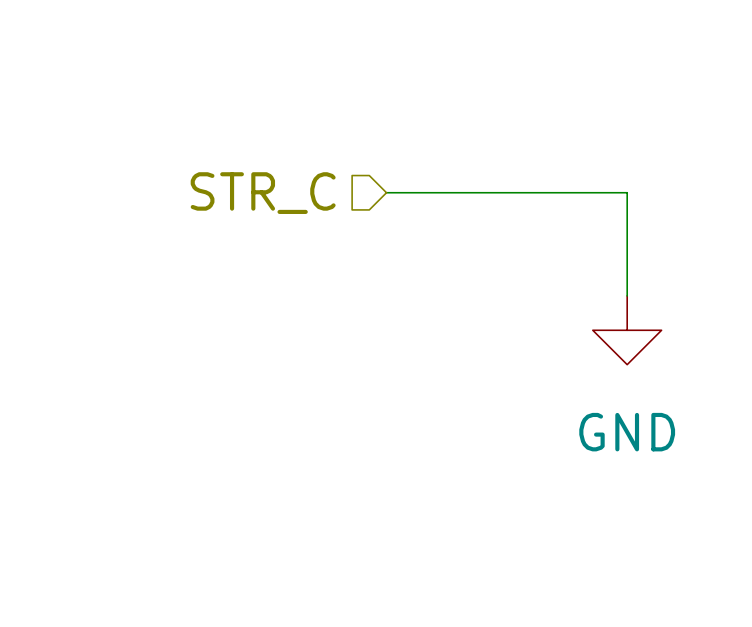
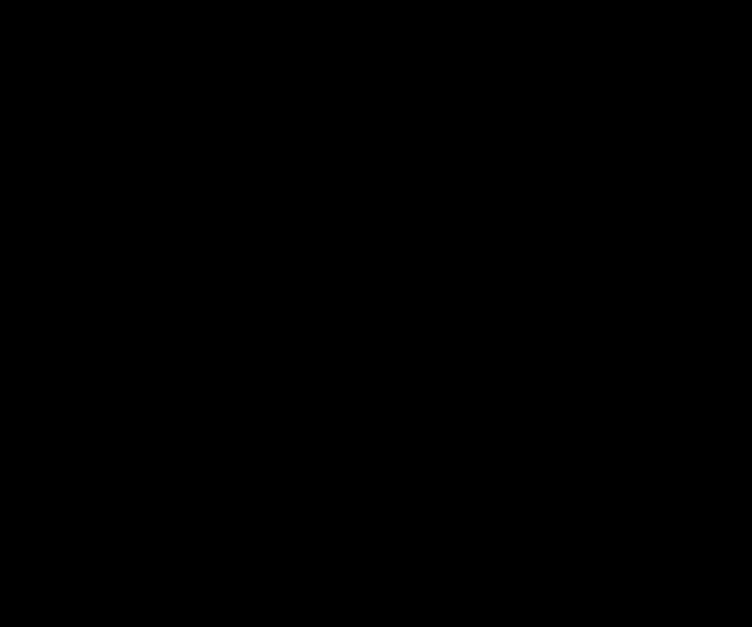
wire: (386, 192) (627, 192) (627, 295) -> none
hierarchical label: STR_C (263, 193) -> none
power symbol: GND (627, 330) -> none

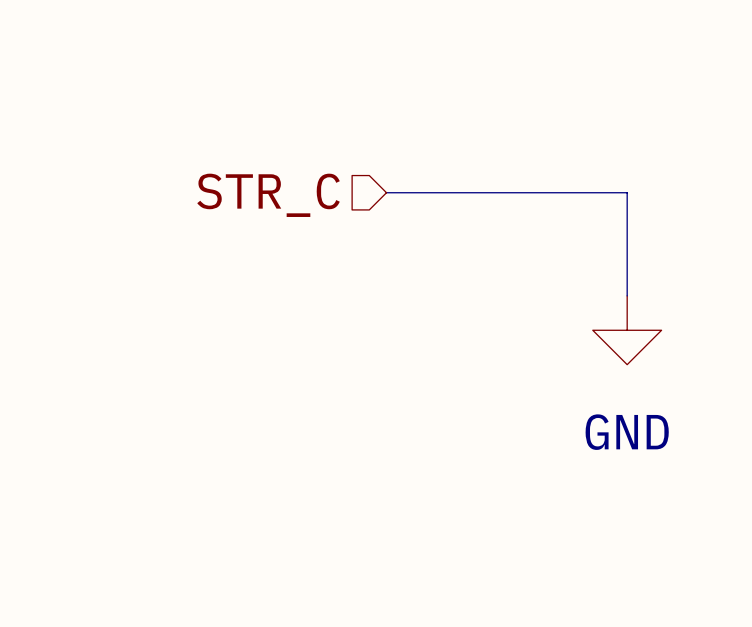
wire: none -> (386, 192) (627, 192) (627, 295)
hierarchical label: none -> STR_C (268, 195)
power symbol: none -> GND (627, 330)

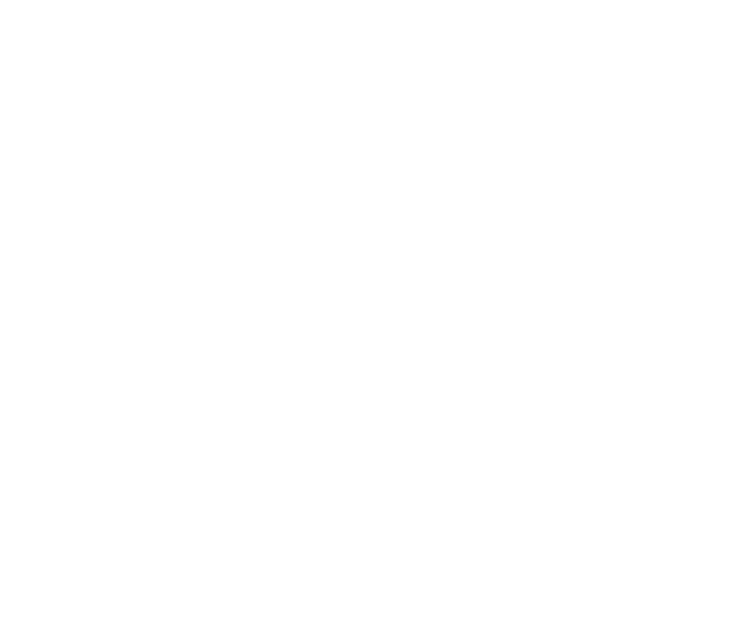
wire: (386, 192) (627, 192) (627, 295) -> none
hierarchical label: STR_C (268, 195) -> none
power symbol: GND (627, 330) -> none

